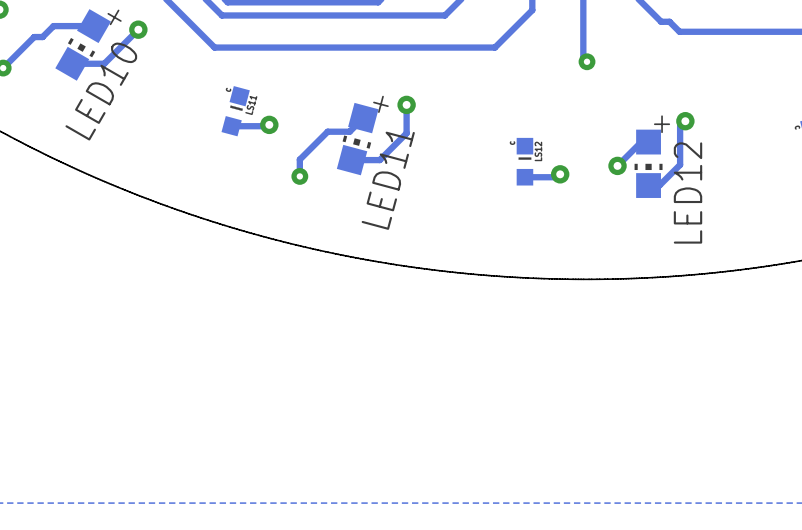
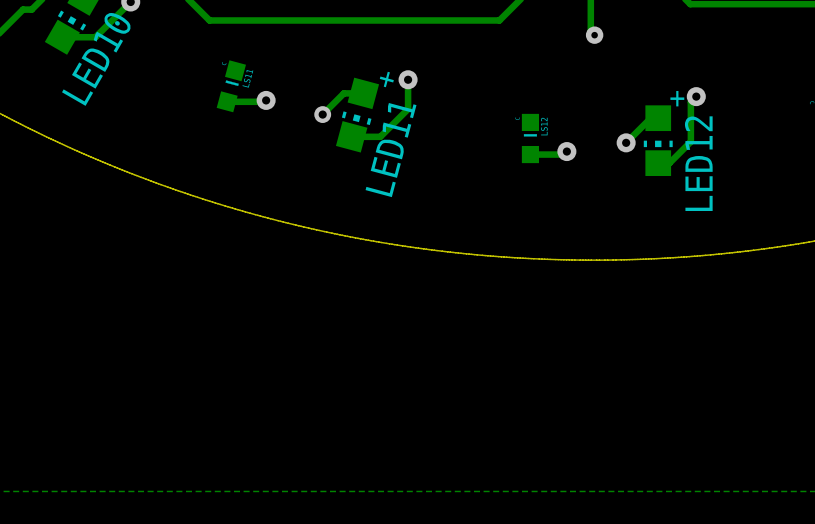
track: (363, 118) (349, 131) (327, 131) (299, 159) (299, 176) -> (363, 93) (343, 93) (322, 114)
via: none -> (322, 114)
via: (299, 176) -> none

